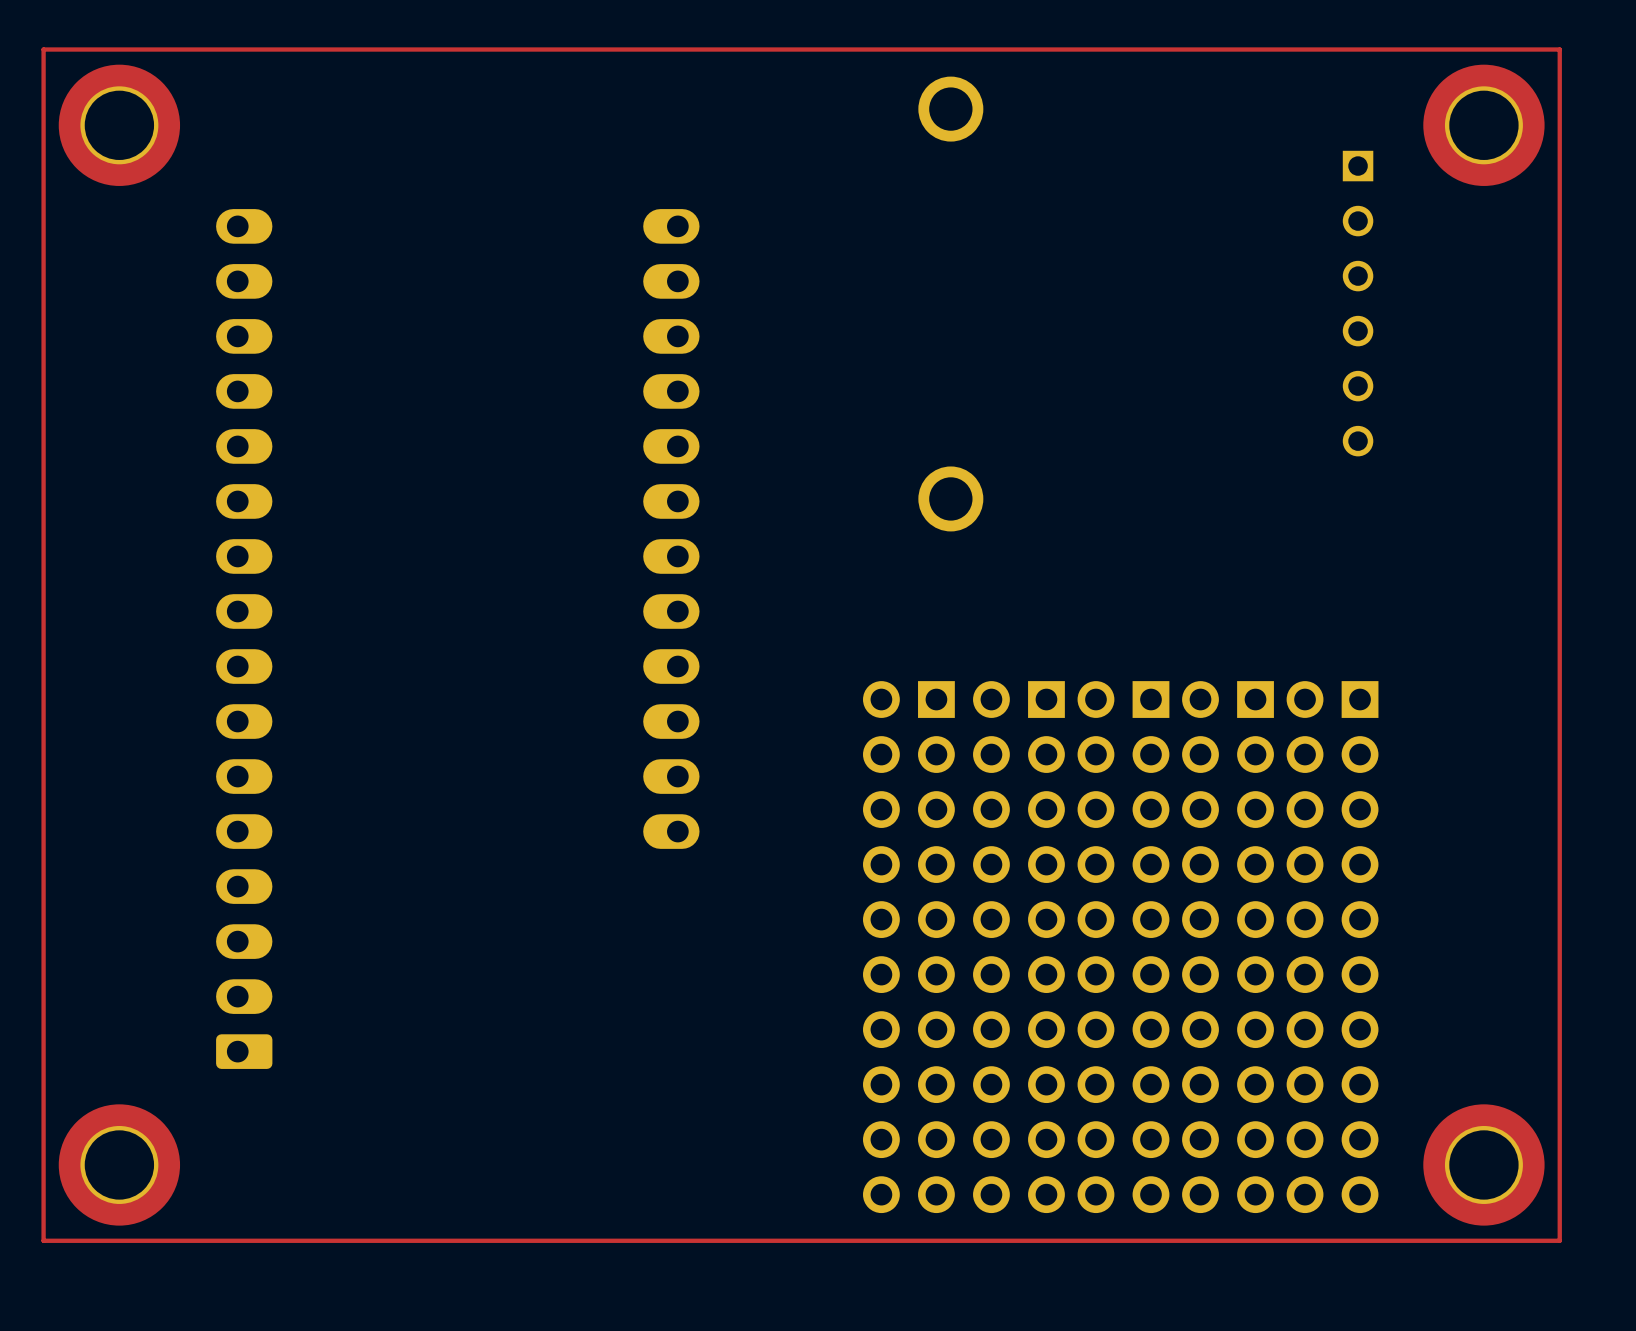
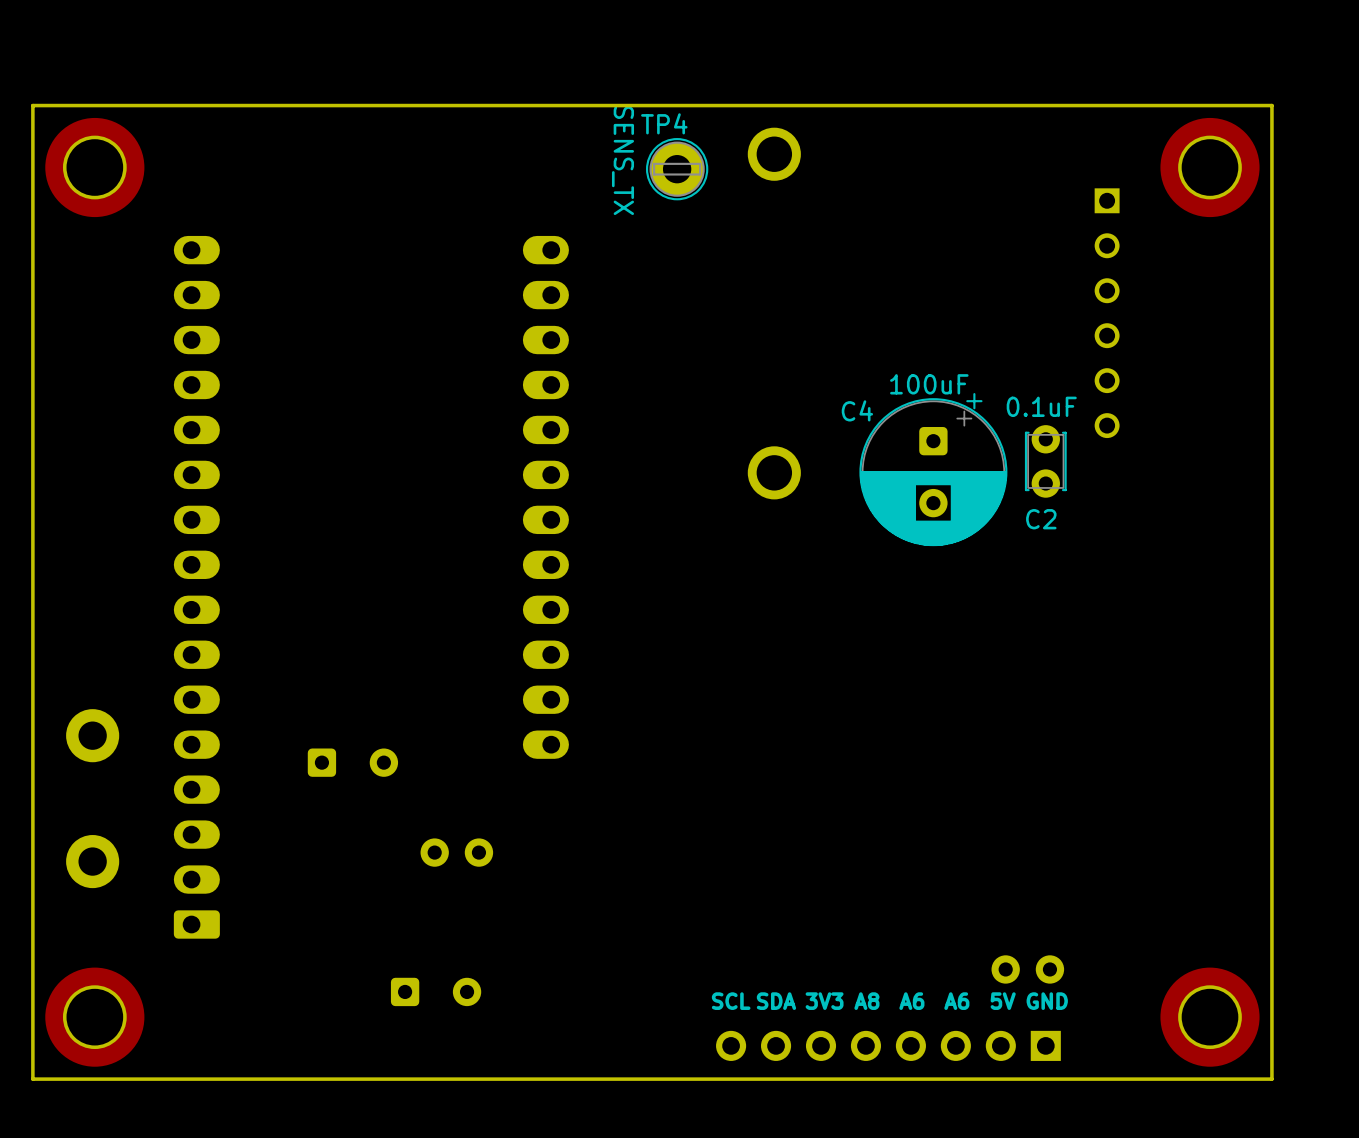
top track: (1559, 49) (43, 49) (43, 1240) (1559, 1240) (1559, 49) -> none
board edge: none -> (1271, 105) (32, 105) (32, 1079) (1271, 1079) (1271, 105)
TP4: none -> SENS_TX (677, 169)
C2: none -> 0.1uF (1045, 461)
C4: none -> 100uF (933, 469)
part: none -> (92, 735)
part: none -> (352, 762)
part: (908, 947) -> none
part: (1018, 947) -> none
part: (1123, 947) -> none
part: (1228, 947) -> none
part: (1332, 947) -> none
part: none -> (456, 852)
part: none -> (92, 861)
part: none -> (1027, 969)
part: none -> (436, 991)
text: none -> SCL (731, 1001)
text: none -> SDA (776, 1001)
text: none -> 3V3 (824, 1001)
text: none -> A8 (866, 1001)
text: none -> A6 (911, 1001)
text: none -> A6 (956, 1001)
text: none -> 5V (1003, 1001)
text: none -> GND (1047, 1001)
part: none -> (888, 1045)

